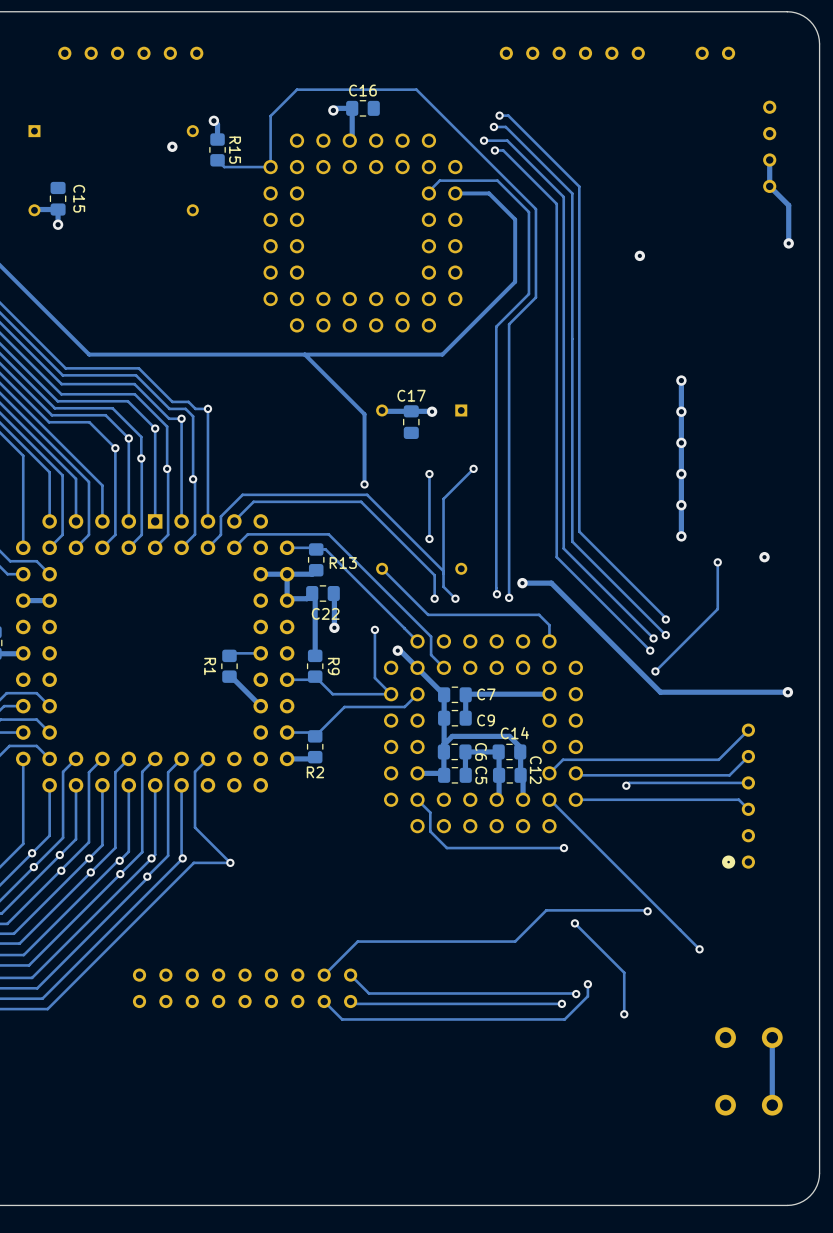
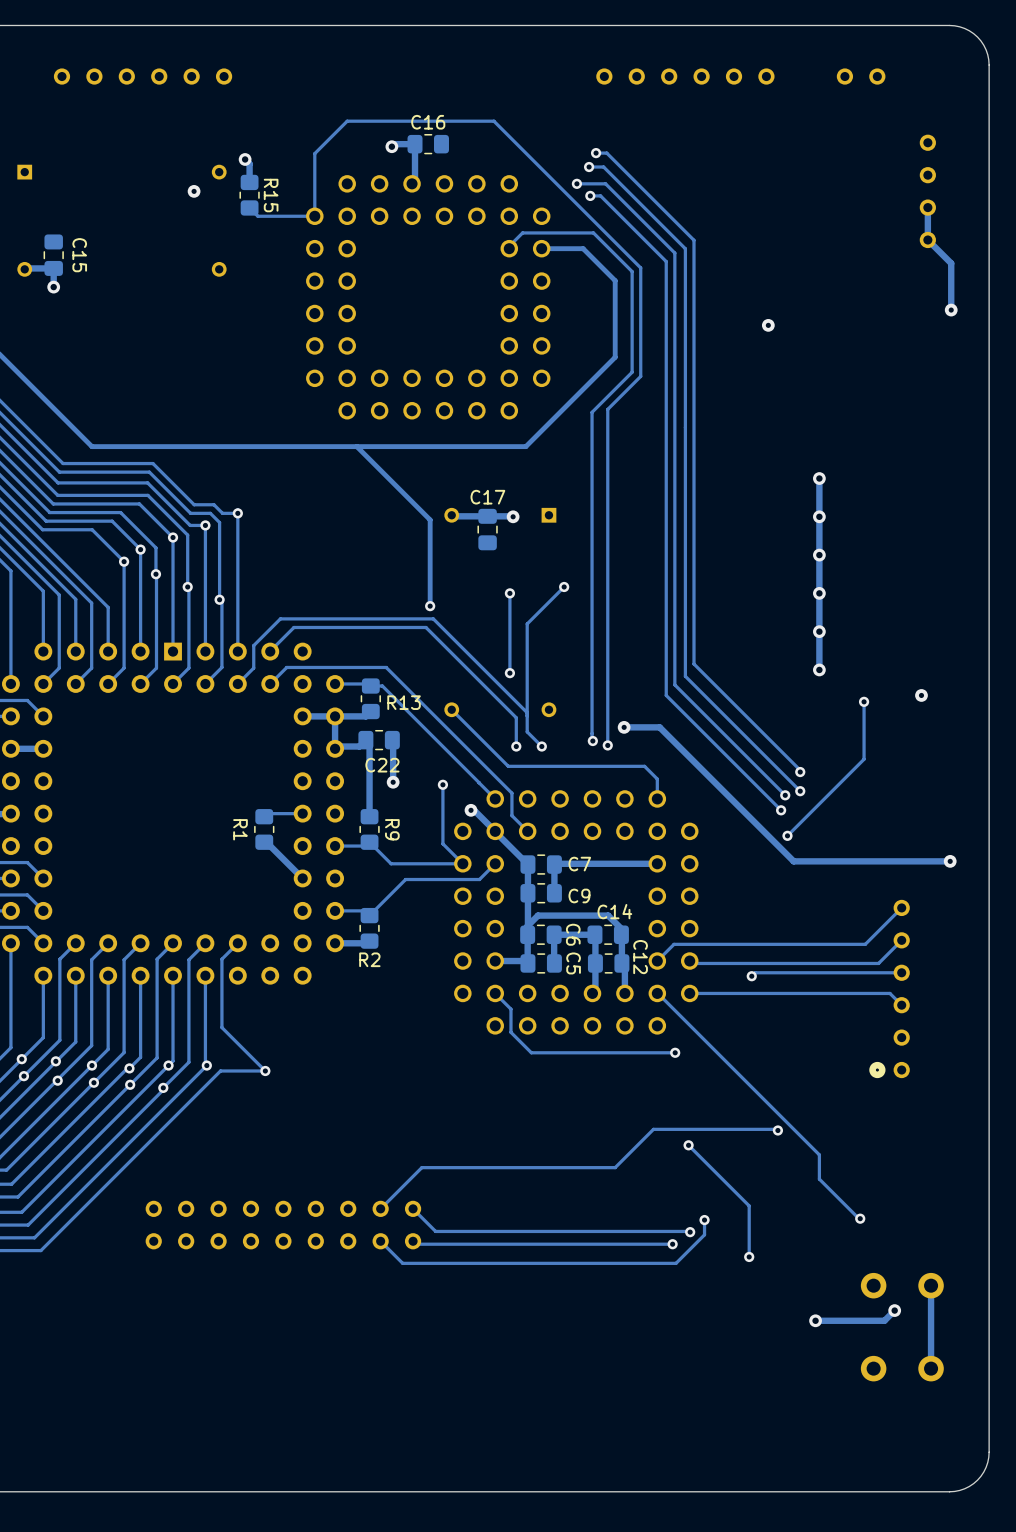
track: (681, 931) (699, 949) -> (819, 1154) (819, 1179) (860, 1218)
via position: (699, 949) -> (860, 1218)
track: none -> (894, 1310) (884, 1320) (815, 1320)
via: none -> (894, 1310)
via: none -> (815, 1320)

